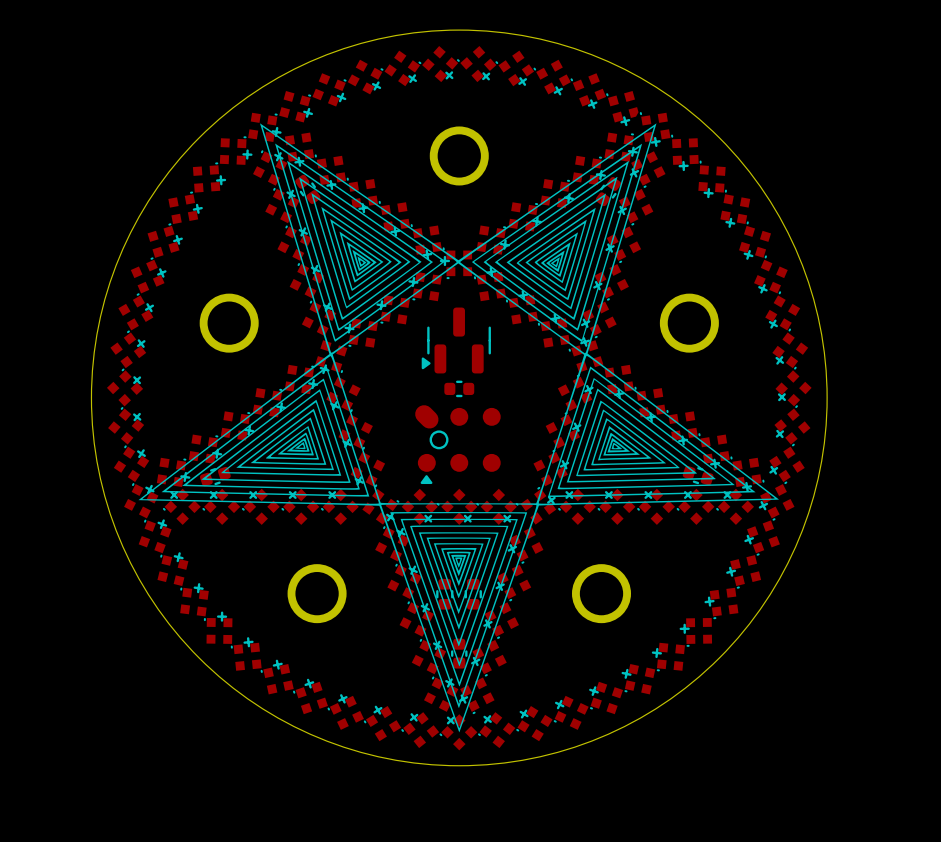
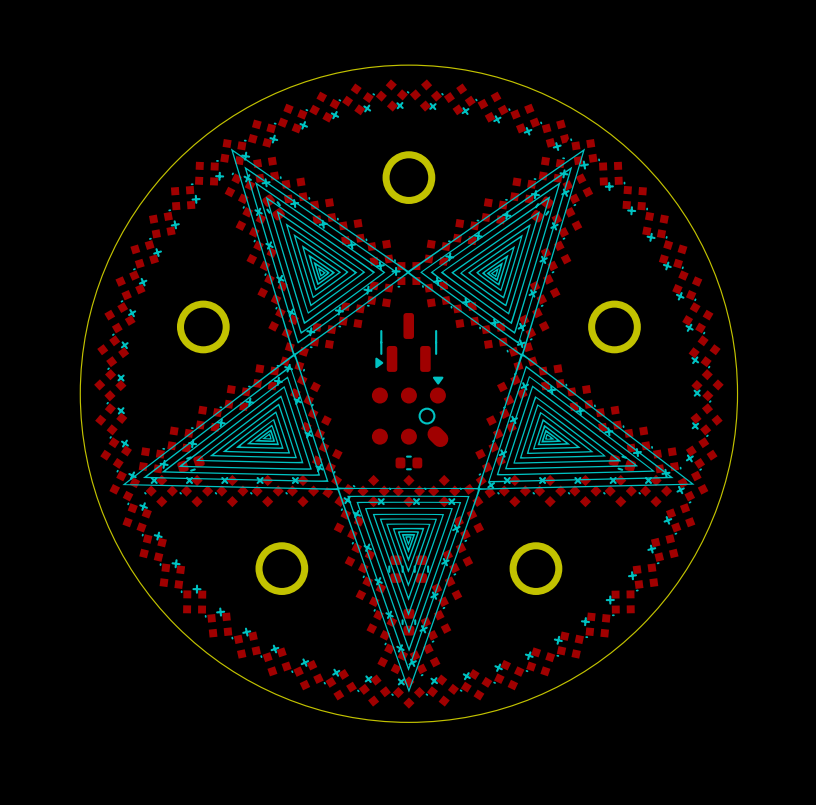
part position: (459, 388) -> (408, 462)
part rotation: 0° (457, 444) -> 180° (410, 411)

